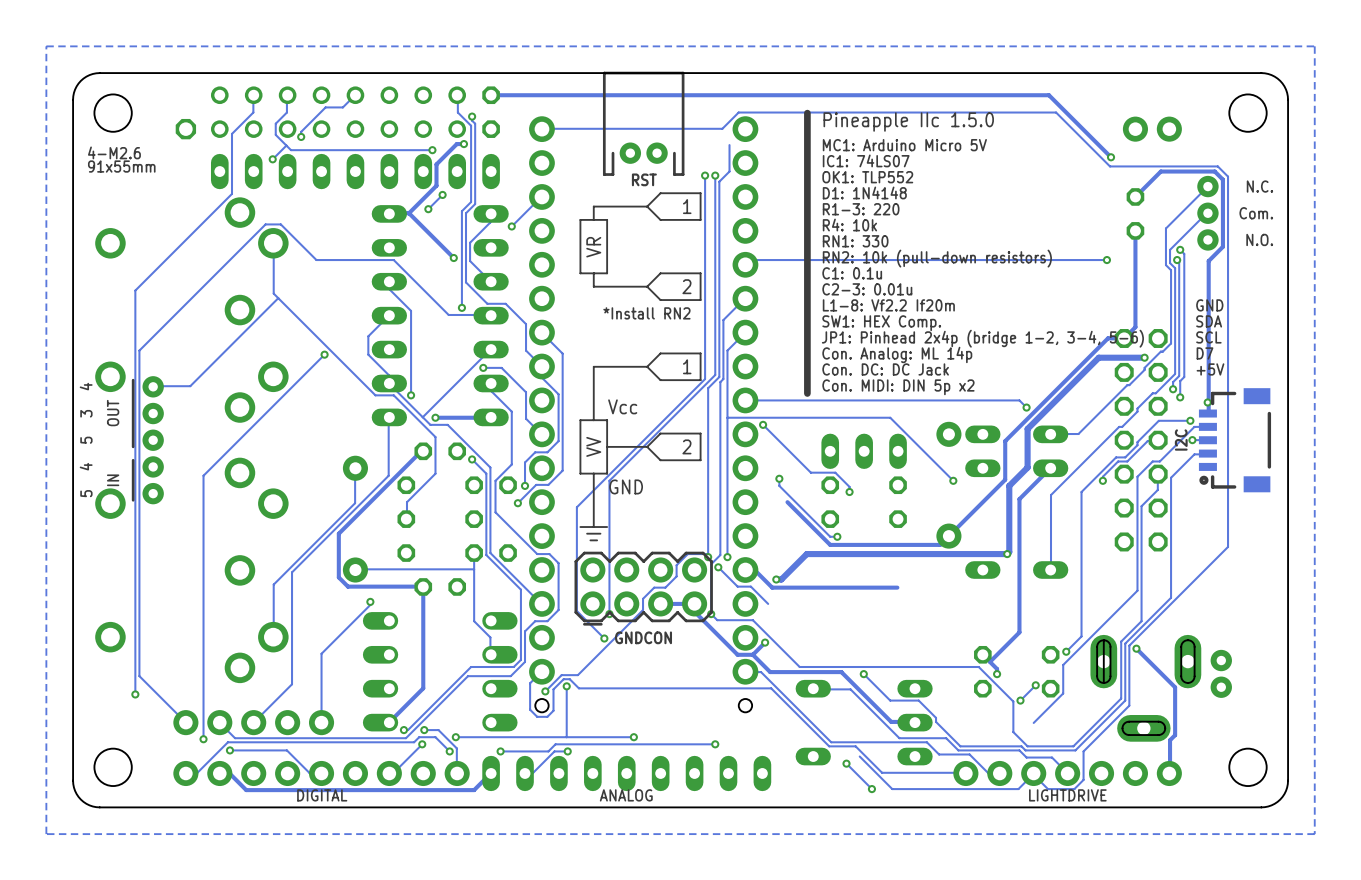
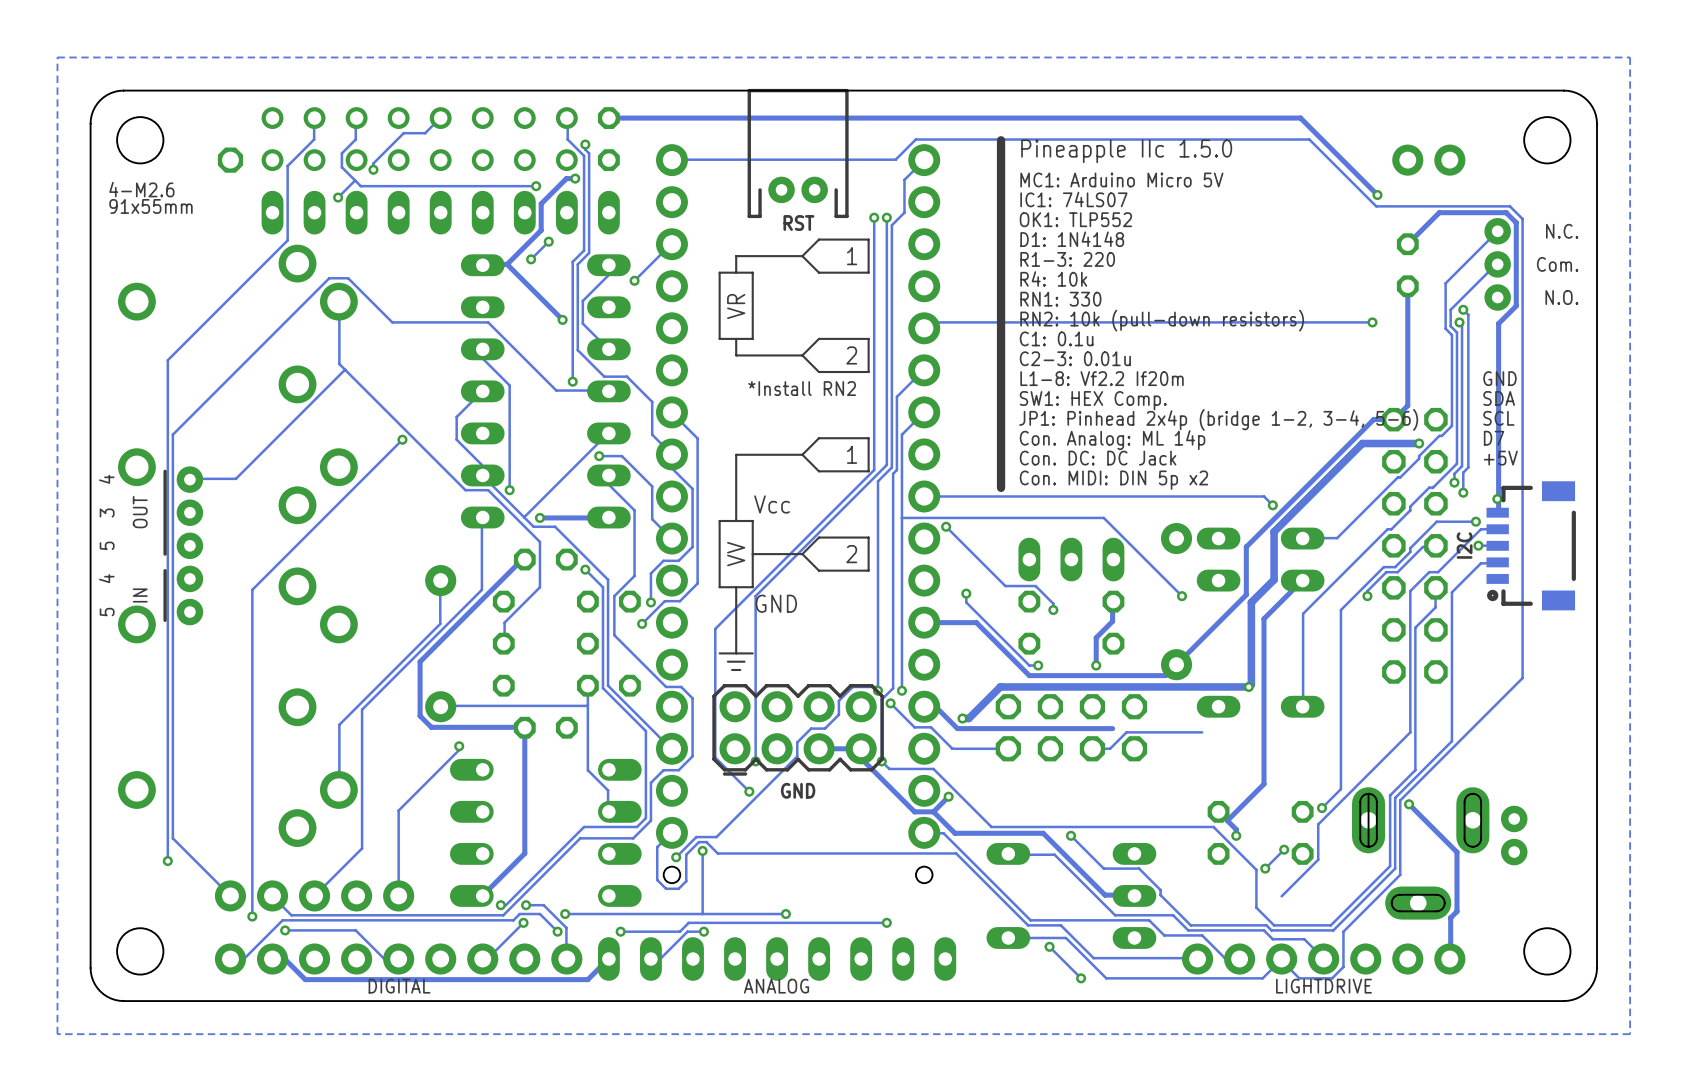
track: none -> (924, 160) (904, 179)
track: none -> (1113, 601) (1112, 621) (1096, 637) (1096, 665)
track: none -> (976, 622) (924, 622)
via: none -> (1096, 665)
part: none -> (1071, 727)
track: none -> (1202, 732) (1126, 732) (1110, 748) (1092, 748)
track: none -> (1008, 748) (952, 748)
GNDCON name: GNDCON (643, 637) -> GND (798, 790)
track: none -> (1065, 937) (1008, 937)

